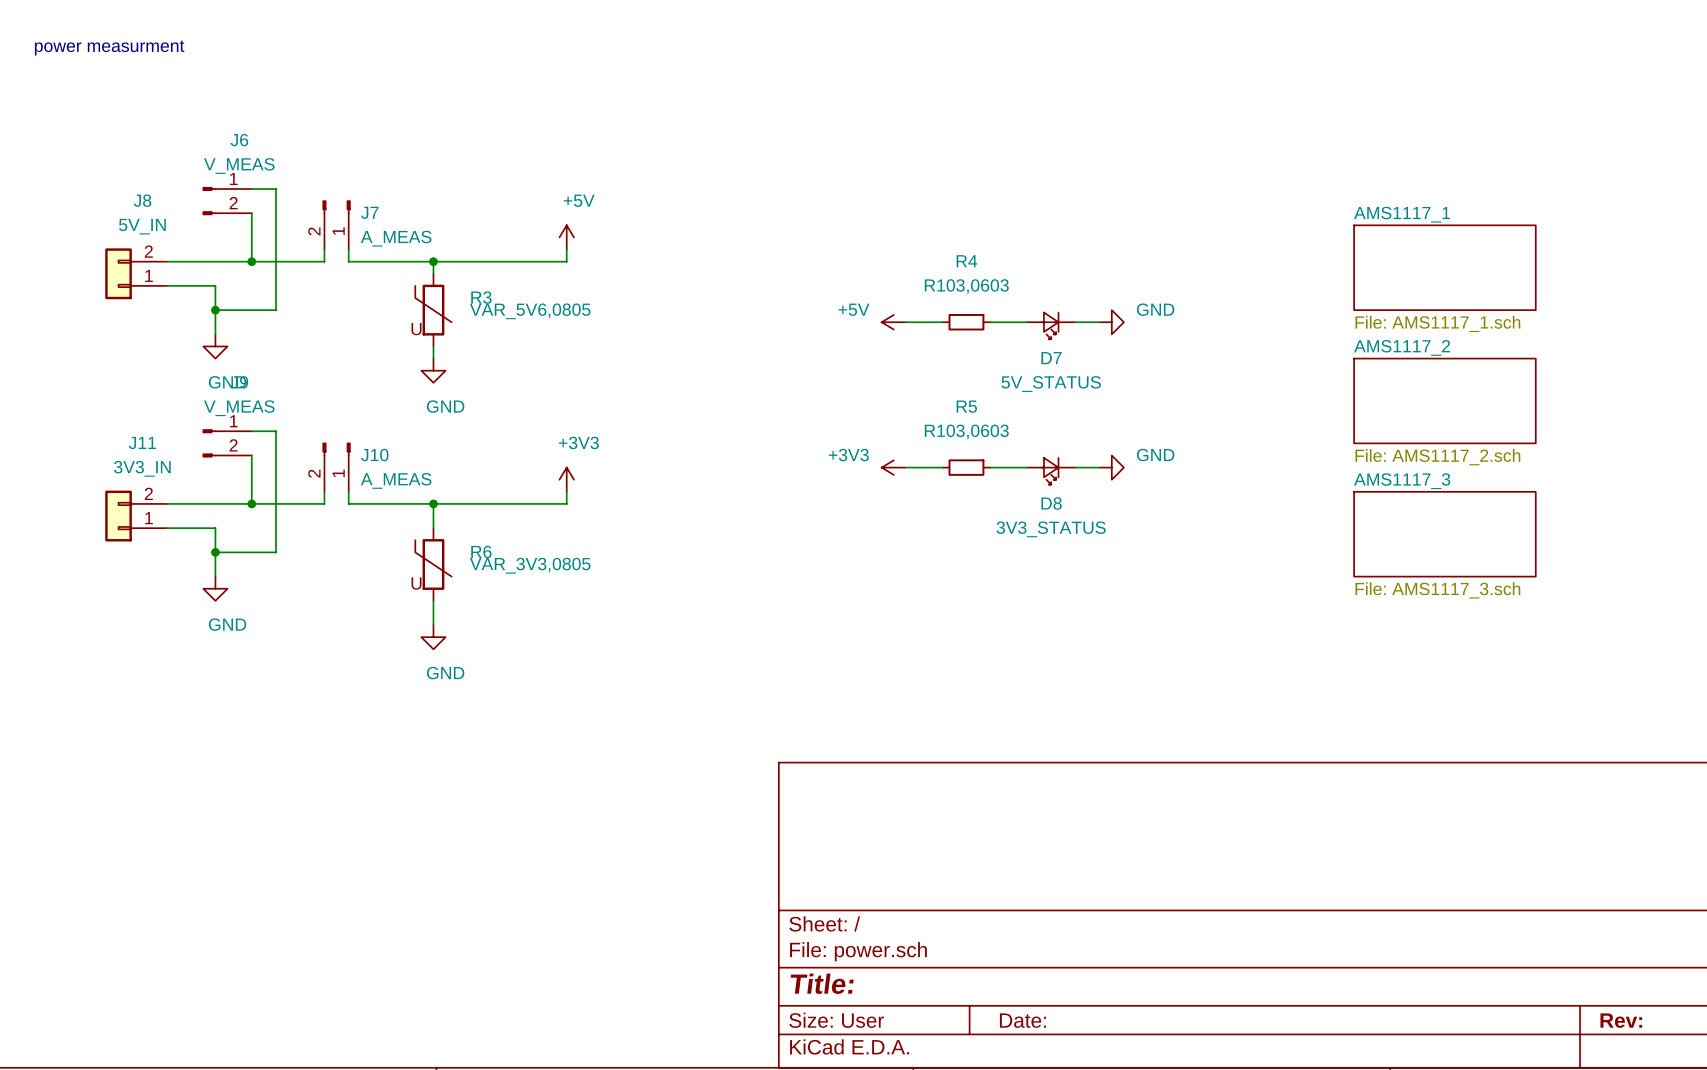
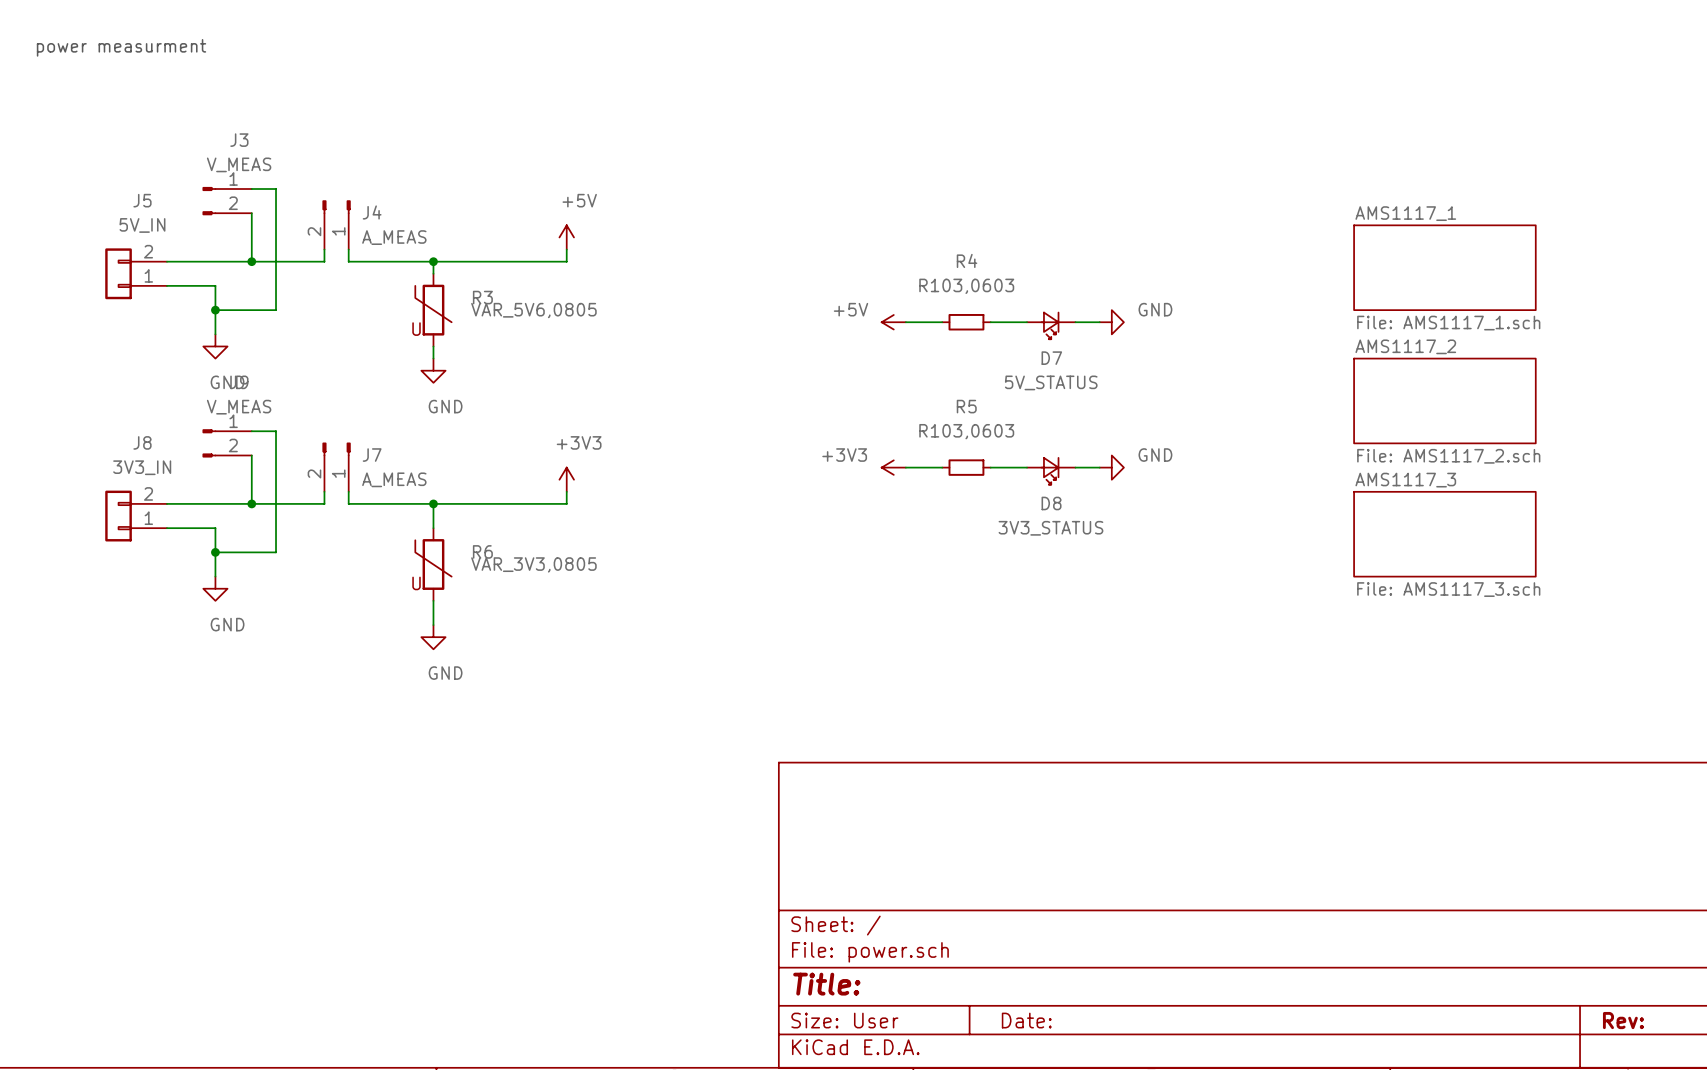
J6 name: J6 (239, 140) -> J3 (239, 140)
J8 name: J8 (142, 200) -> J5 (142, 200)
J7 name: J7 (369, 212) -> J4 (372, 212)
J11 name: J11 (142, 443) -> J8 (142, 442)
J10 name: J10 (374, 455) -> J7 (372, 455)

